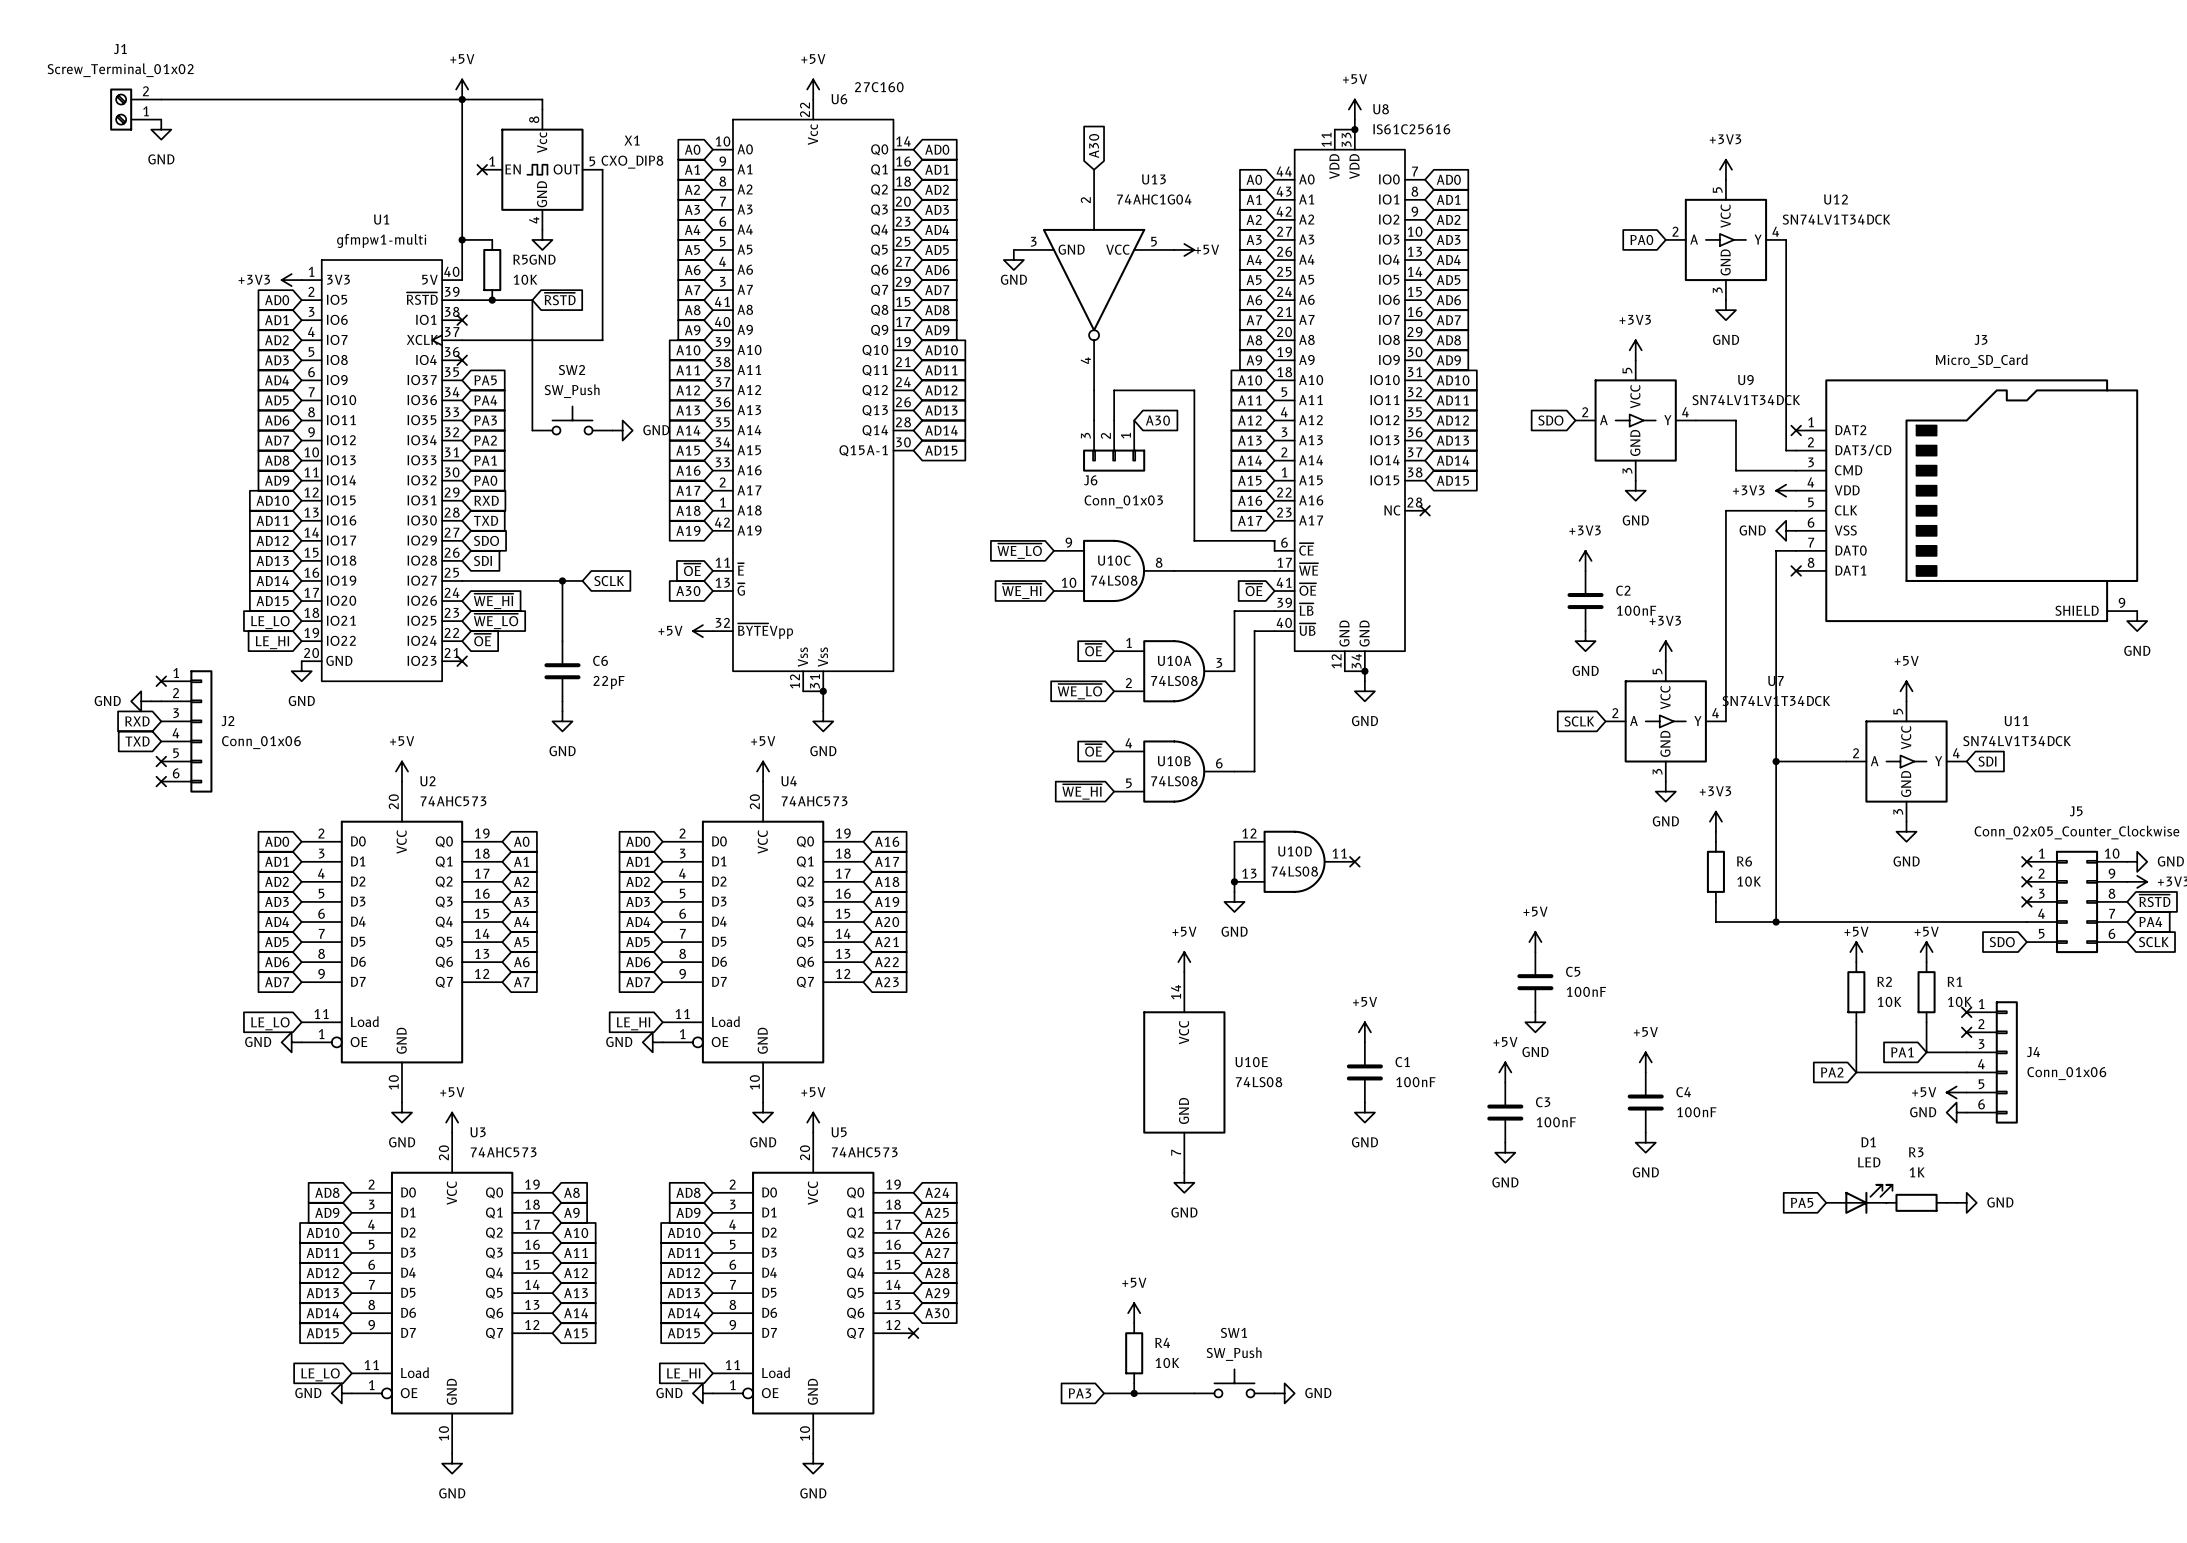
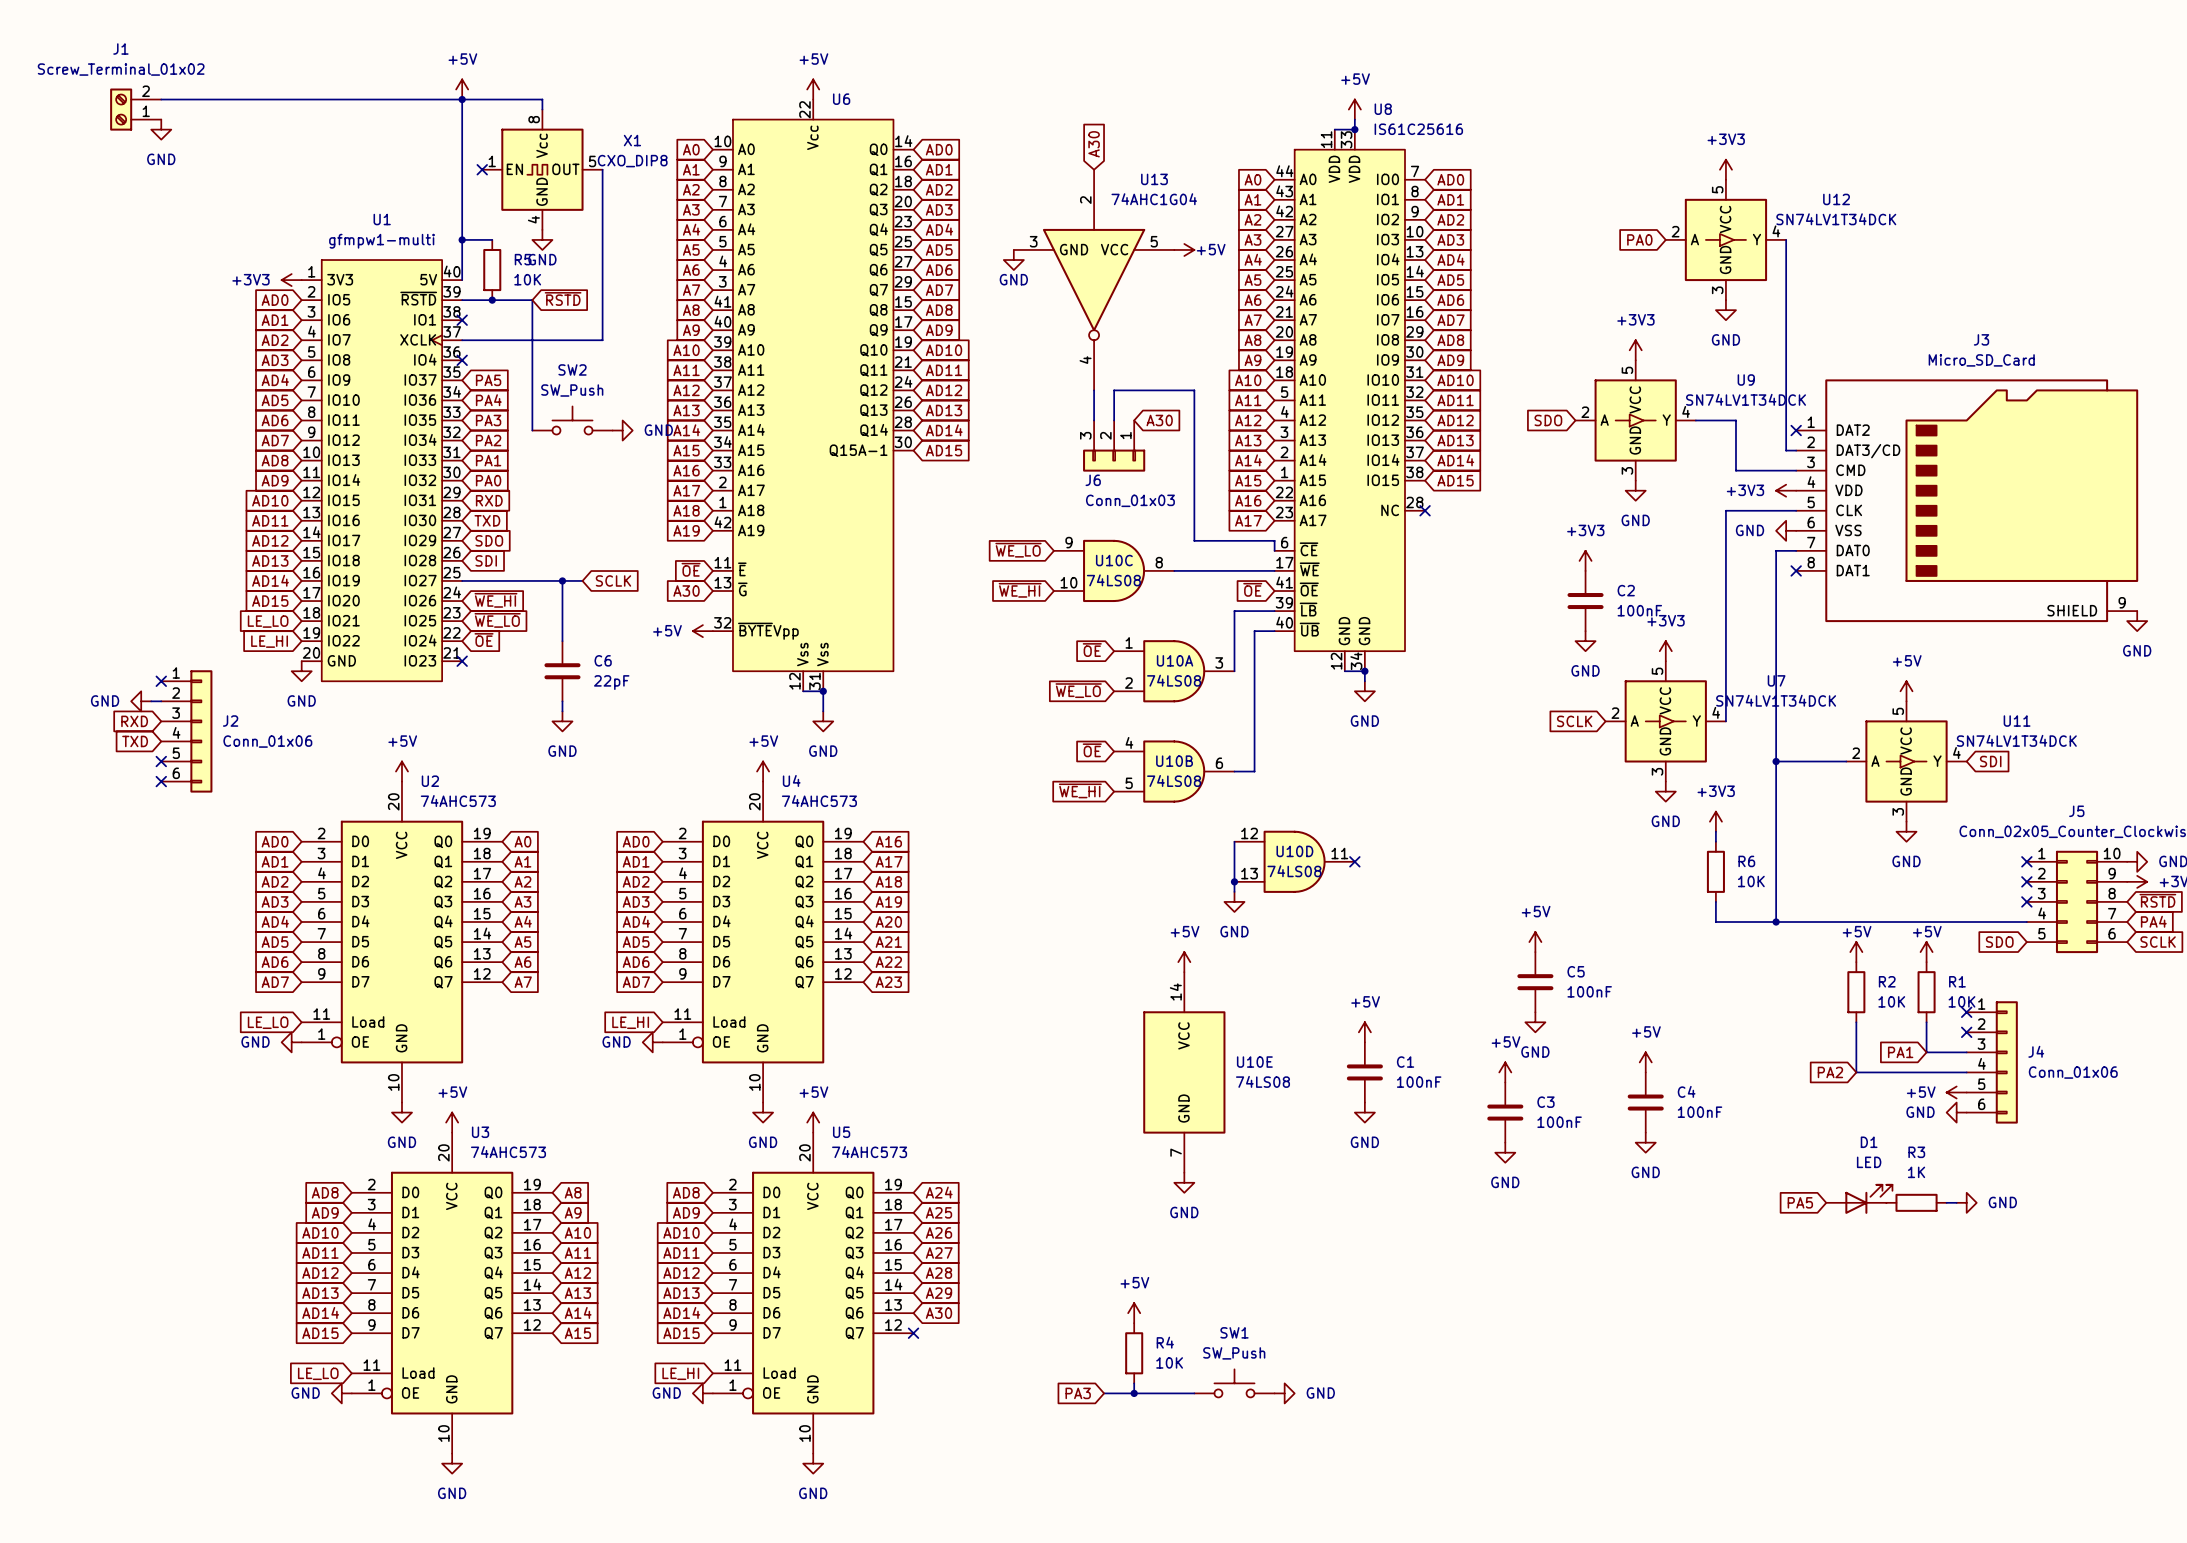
U6 value: 27C160 (879, 87) -> none

